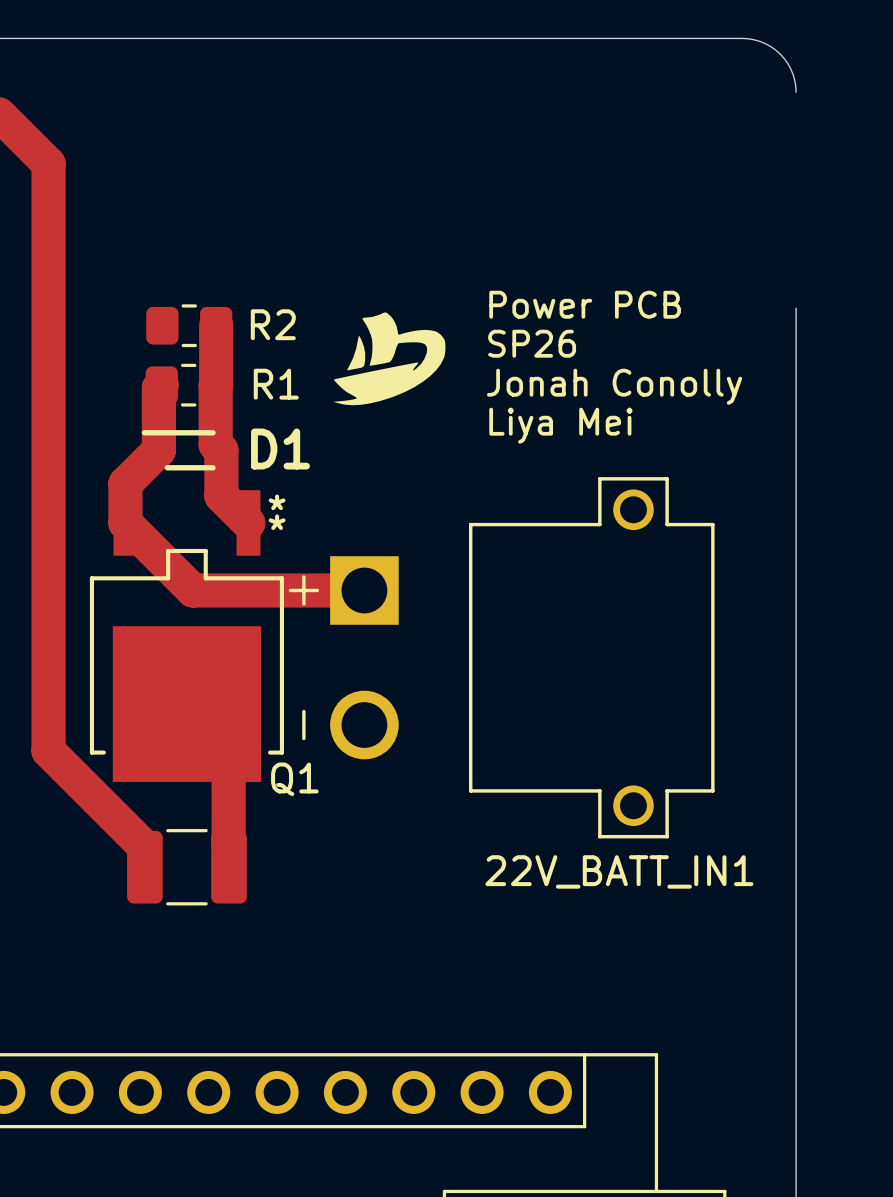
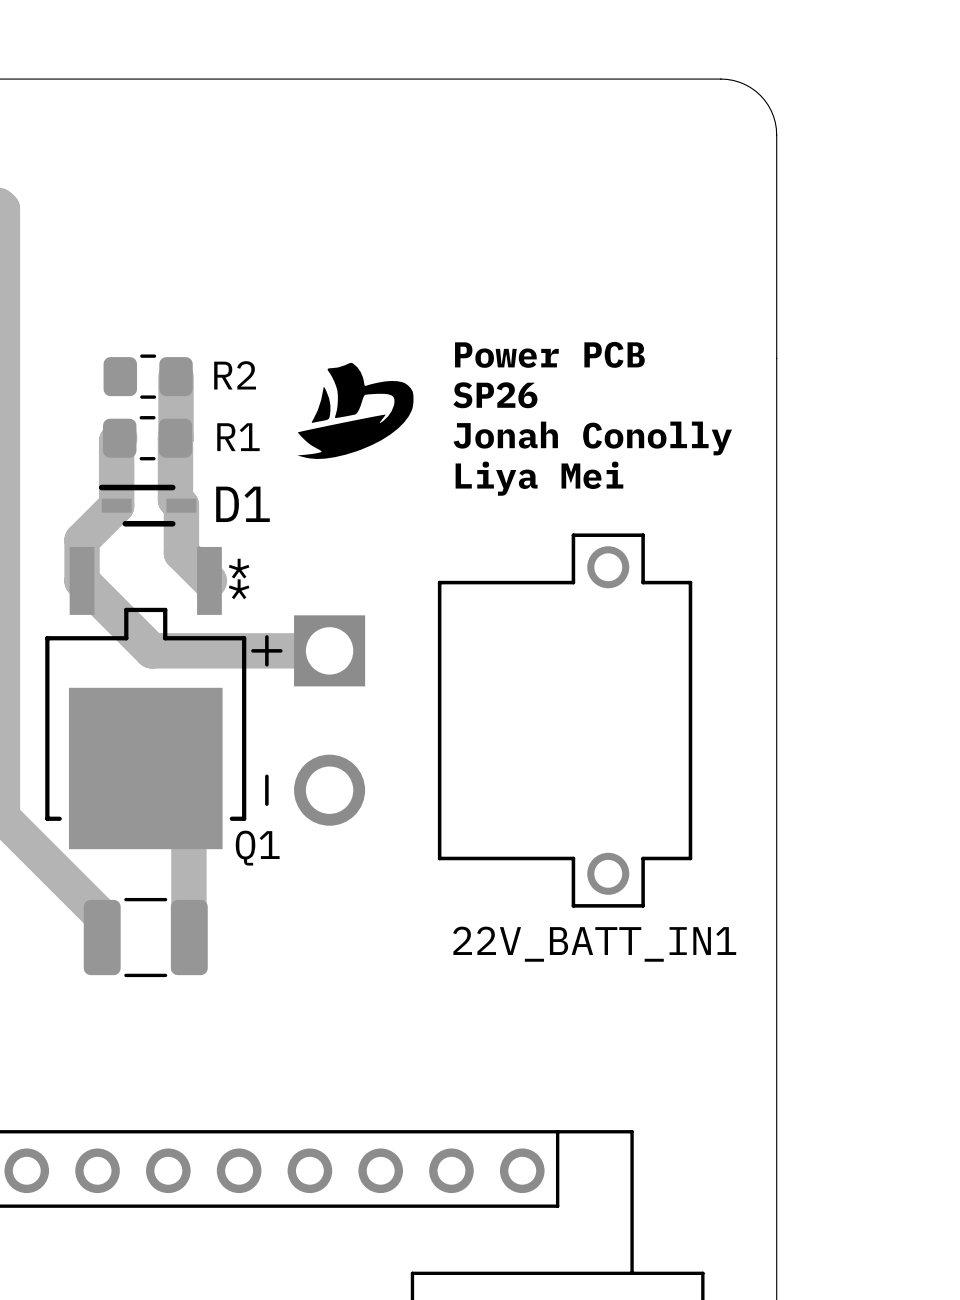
board edge: none -> (776, 134) (776, 358)

